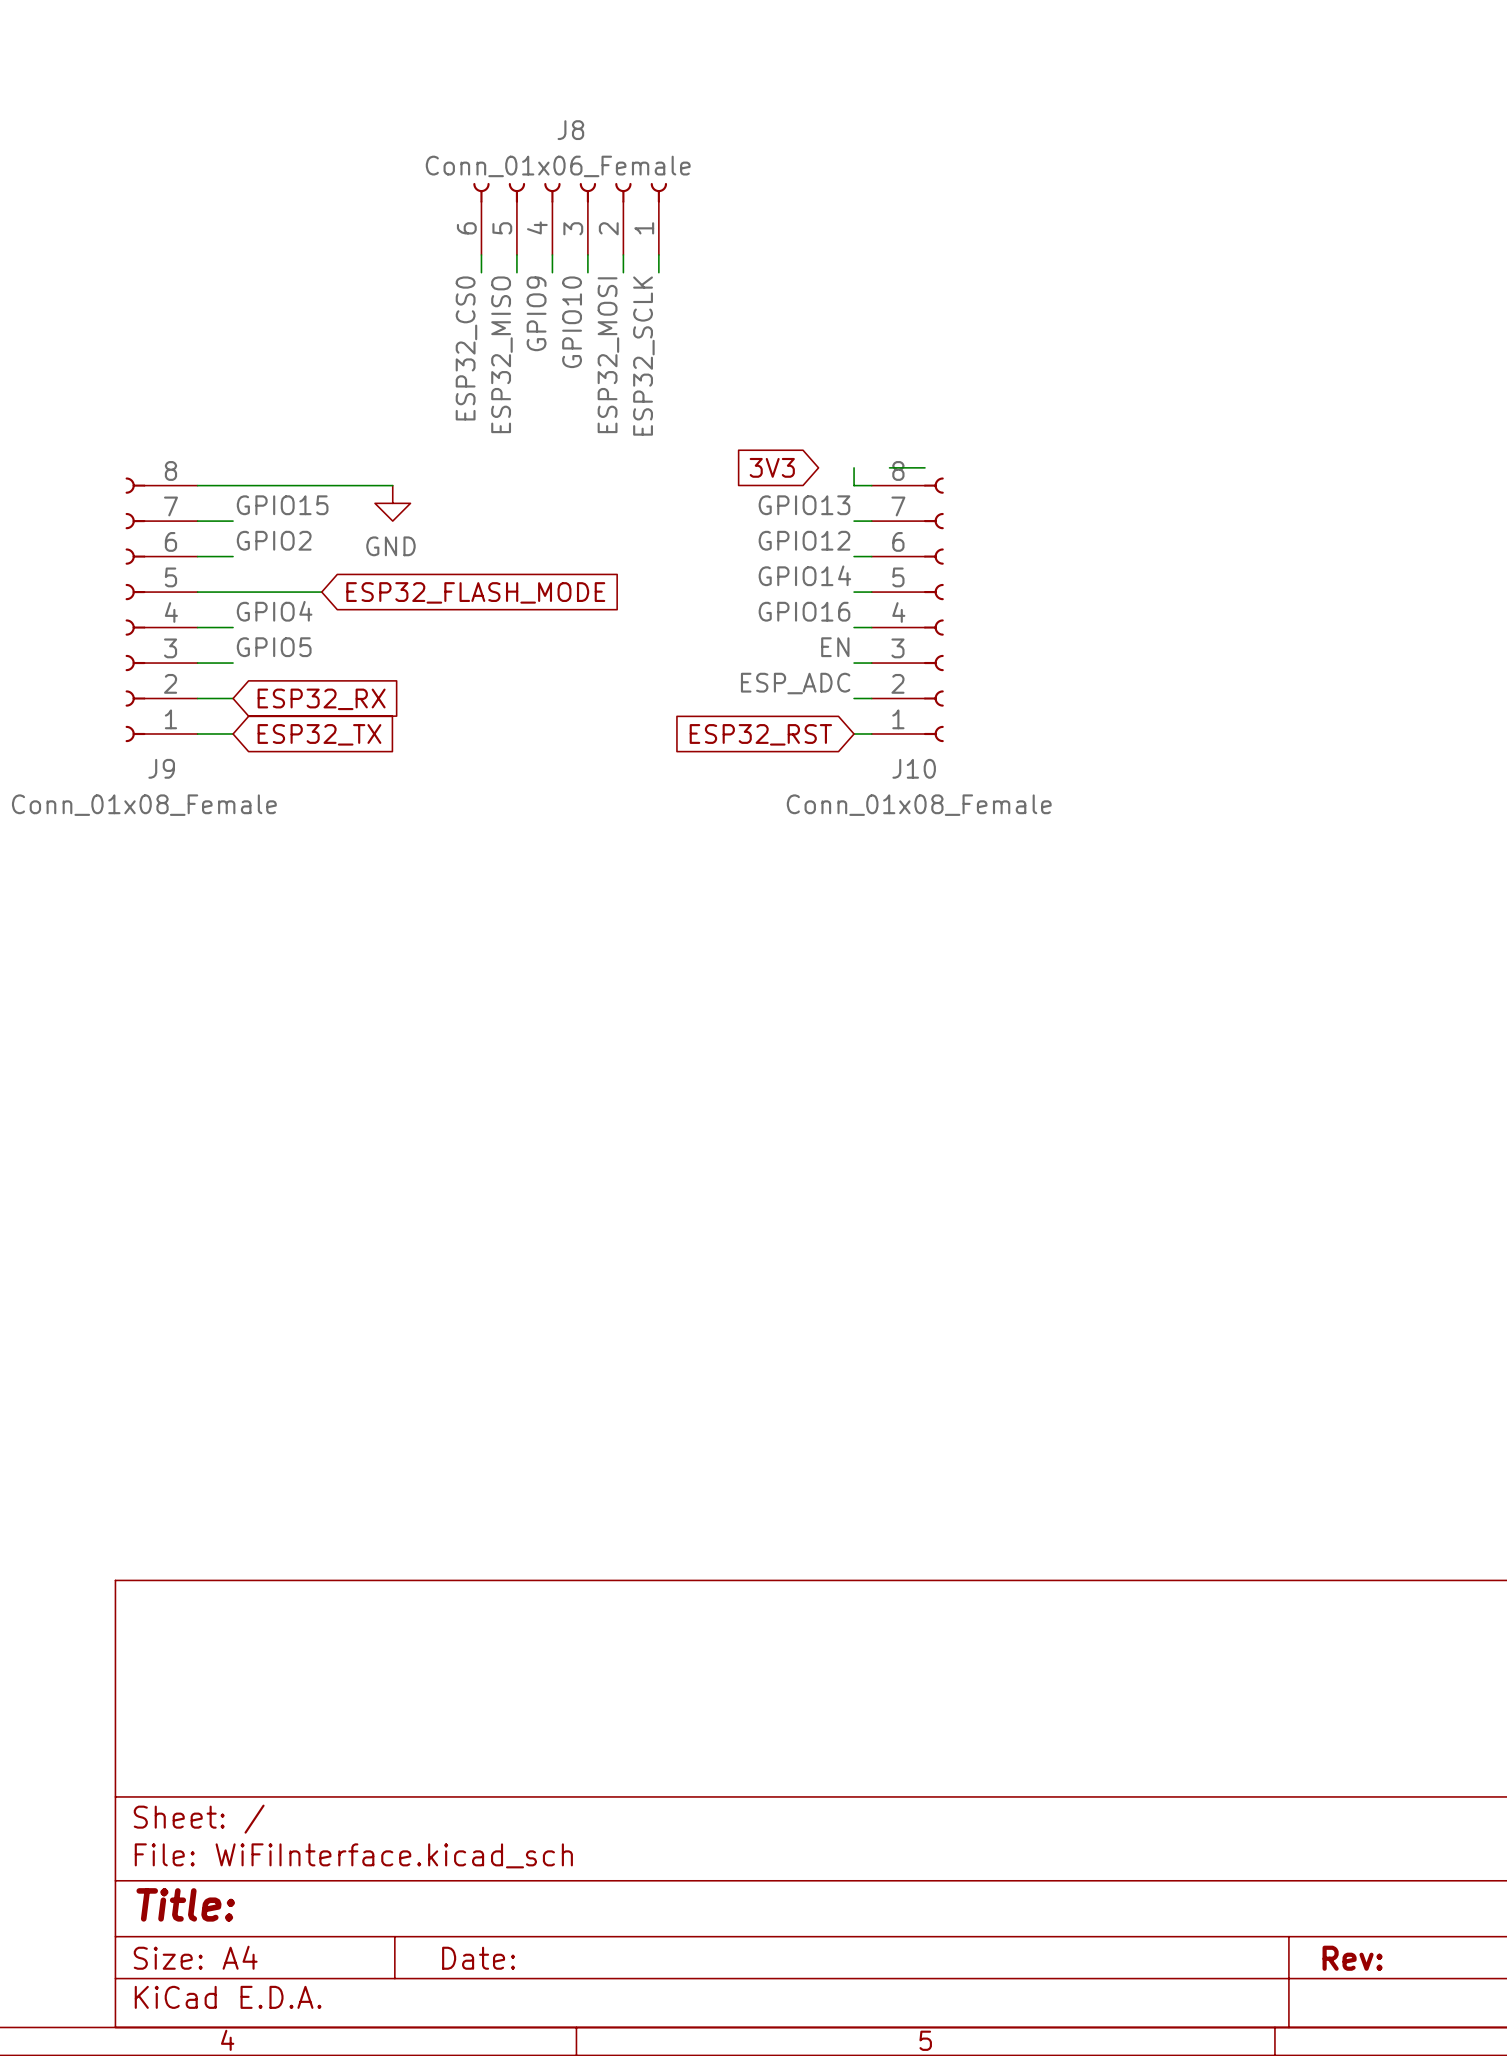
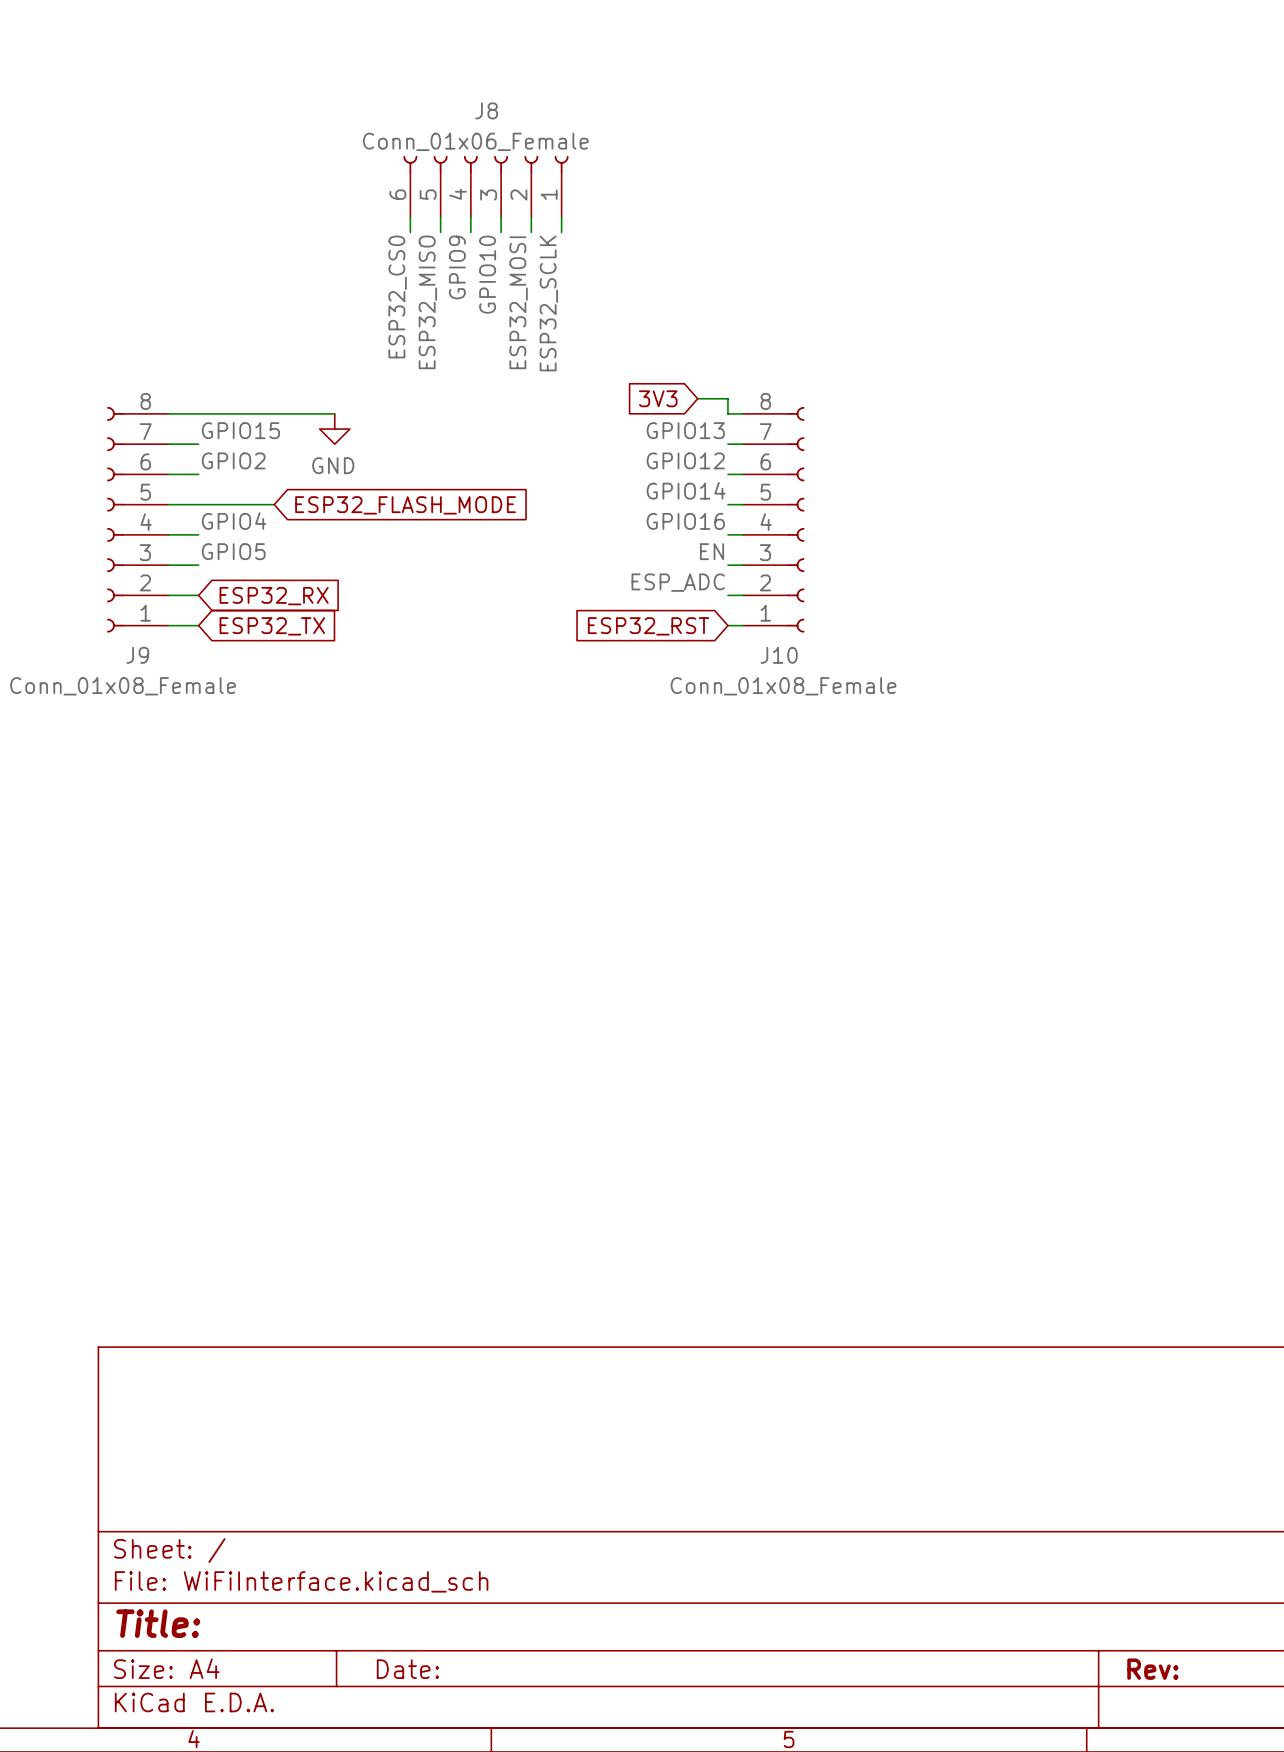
wire: (889, 467) (925, 467) -> (697, 398) (727, 398)

